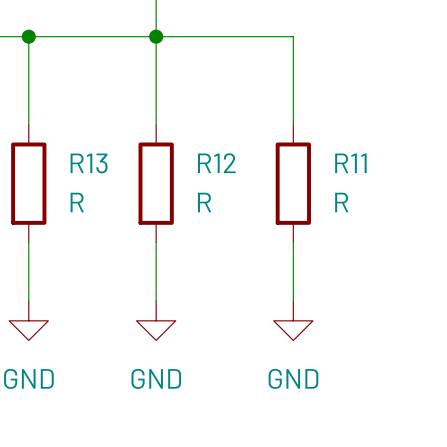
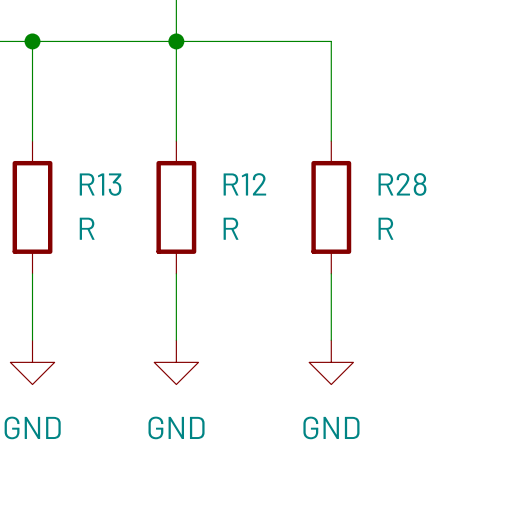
R11 name: R11 (350, 163) -> R28 (402, 184)

